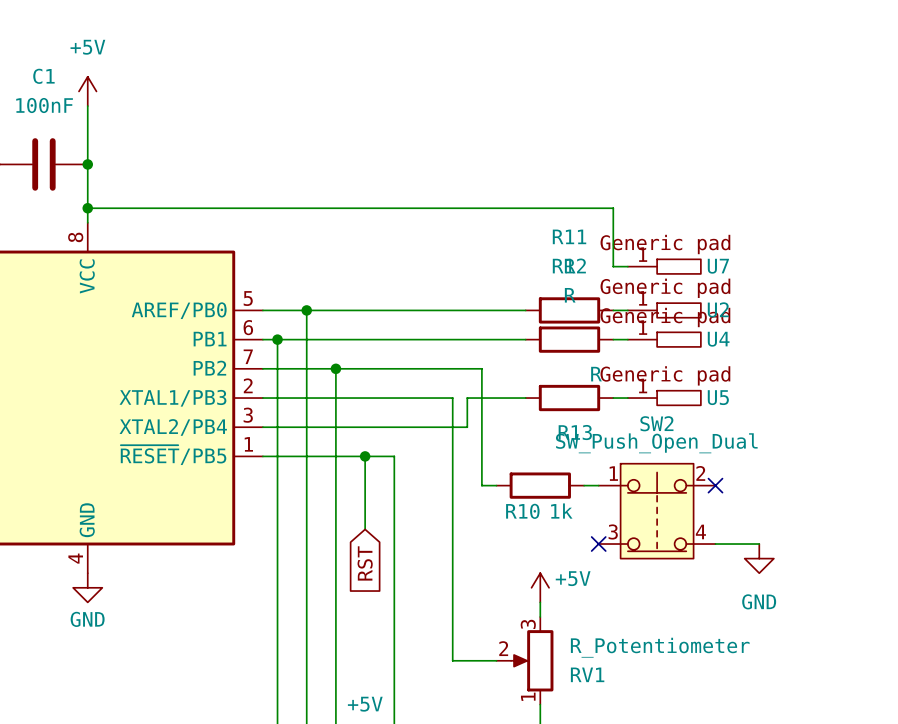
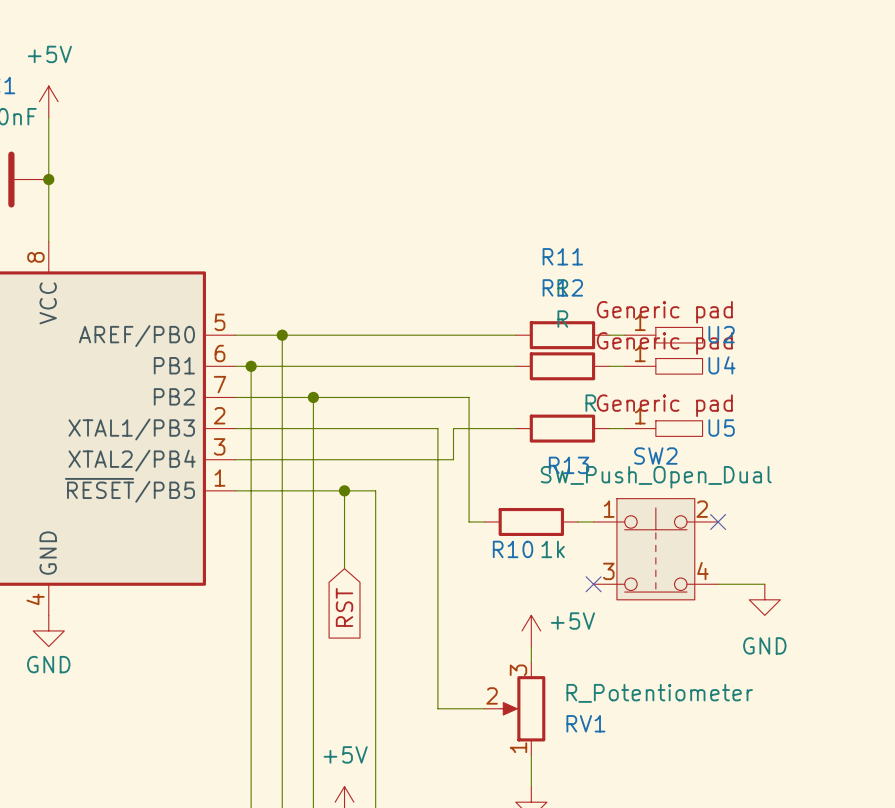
wire: (87, 208) (613, 208) (613, 266) (627, 266) -> none
junction: (87, 208) -> none
U7: (664, 266) -> none

